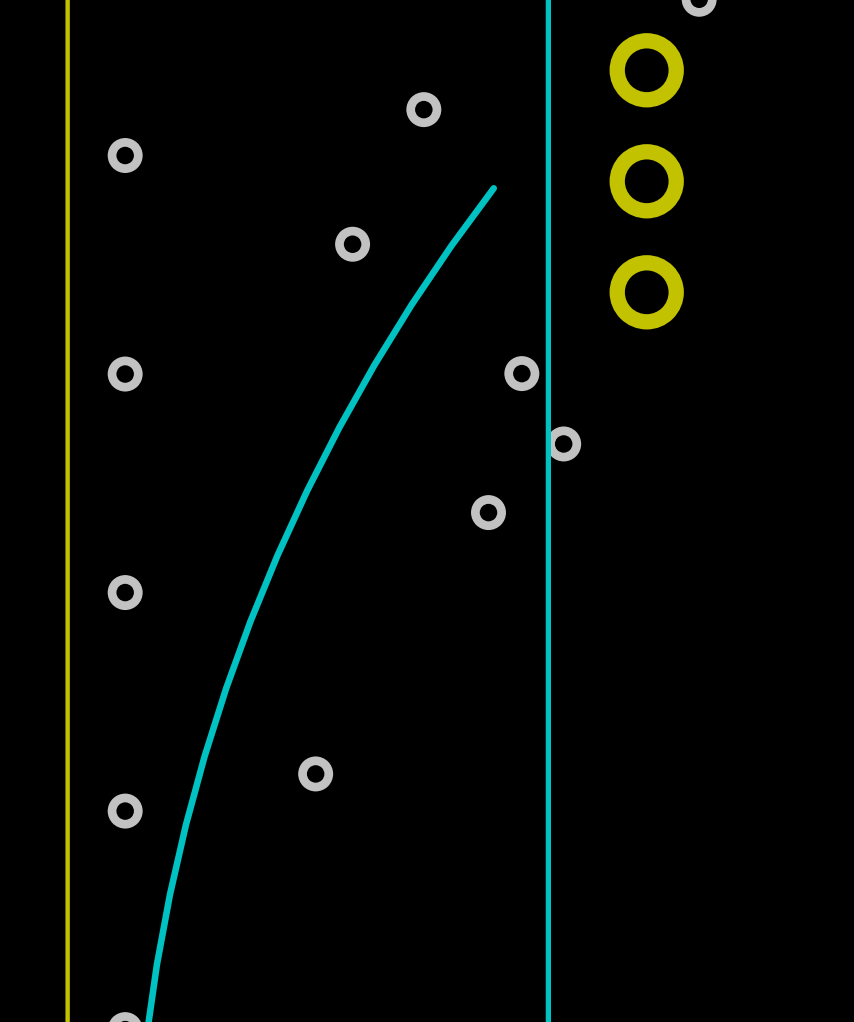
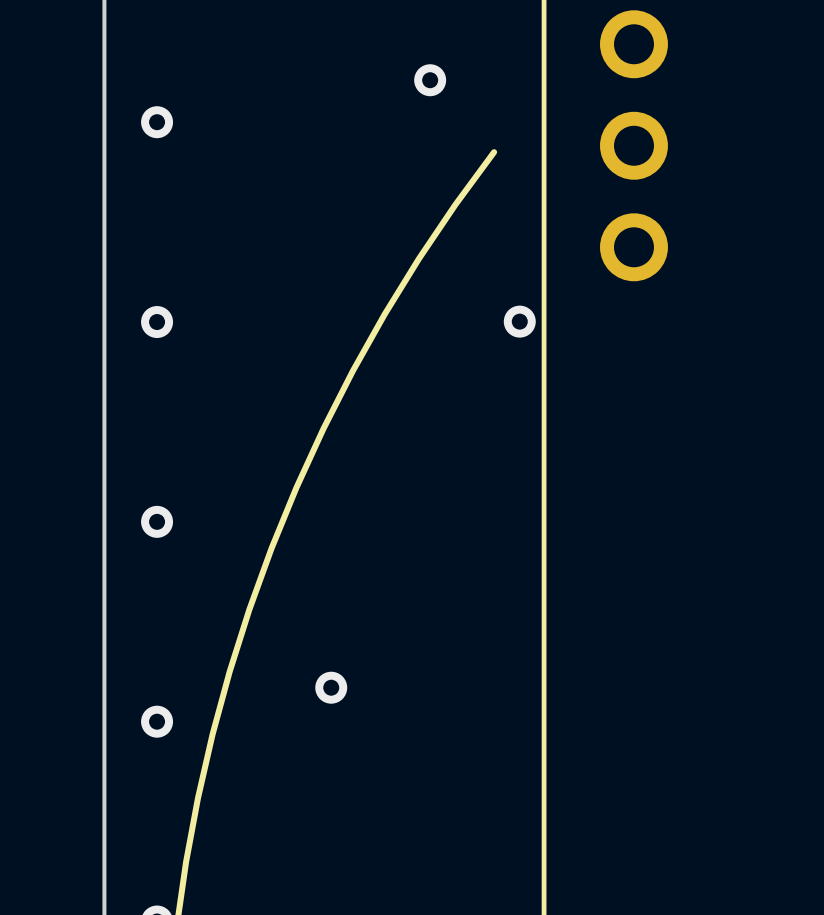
via: (352, 244) -> none
via: (563, 443) -> none
via: (488, 512) -> none

